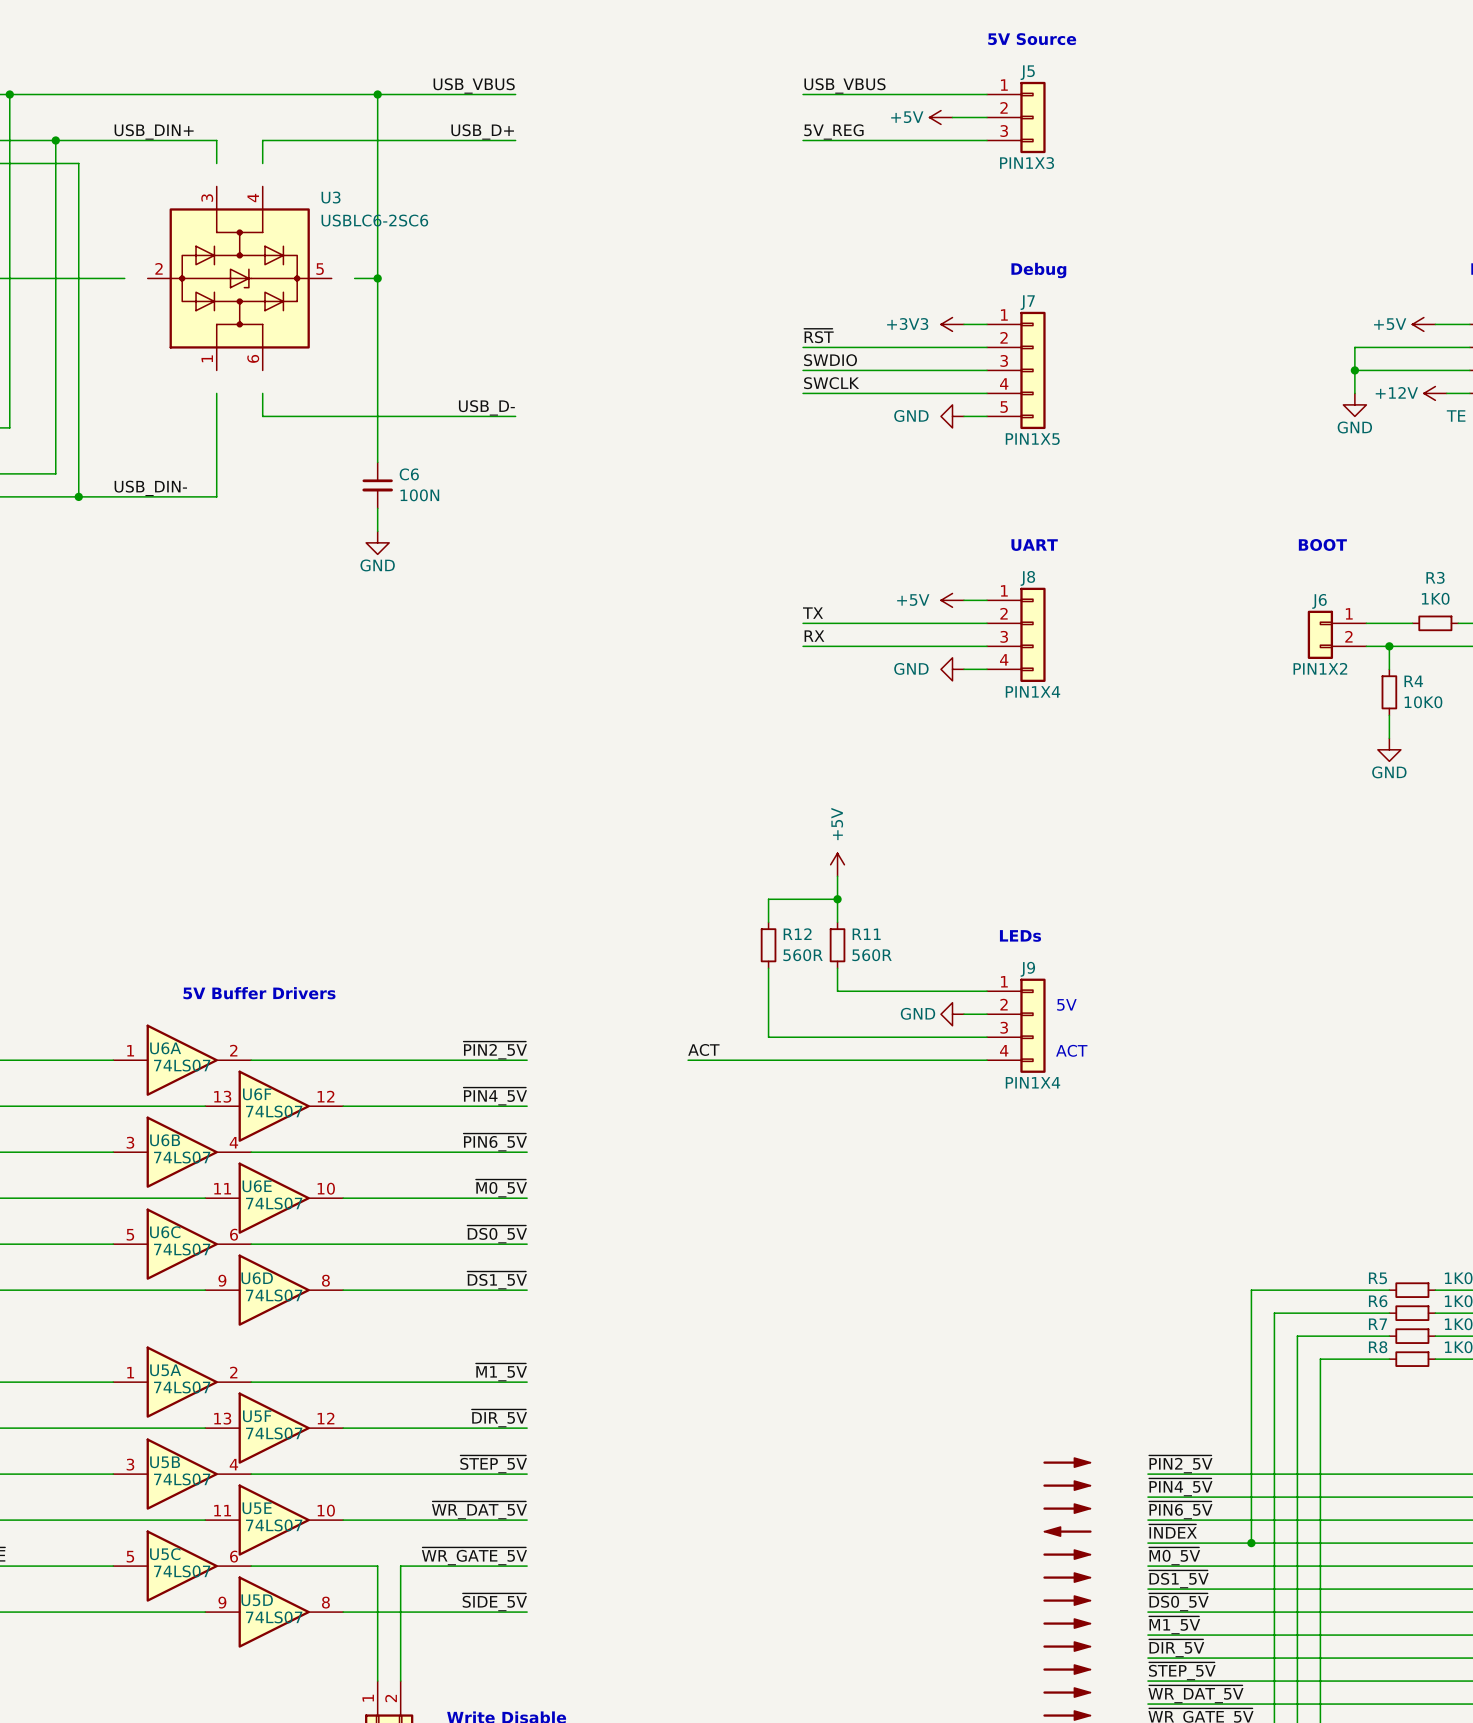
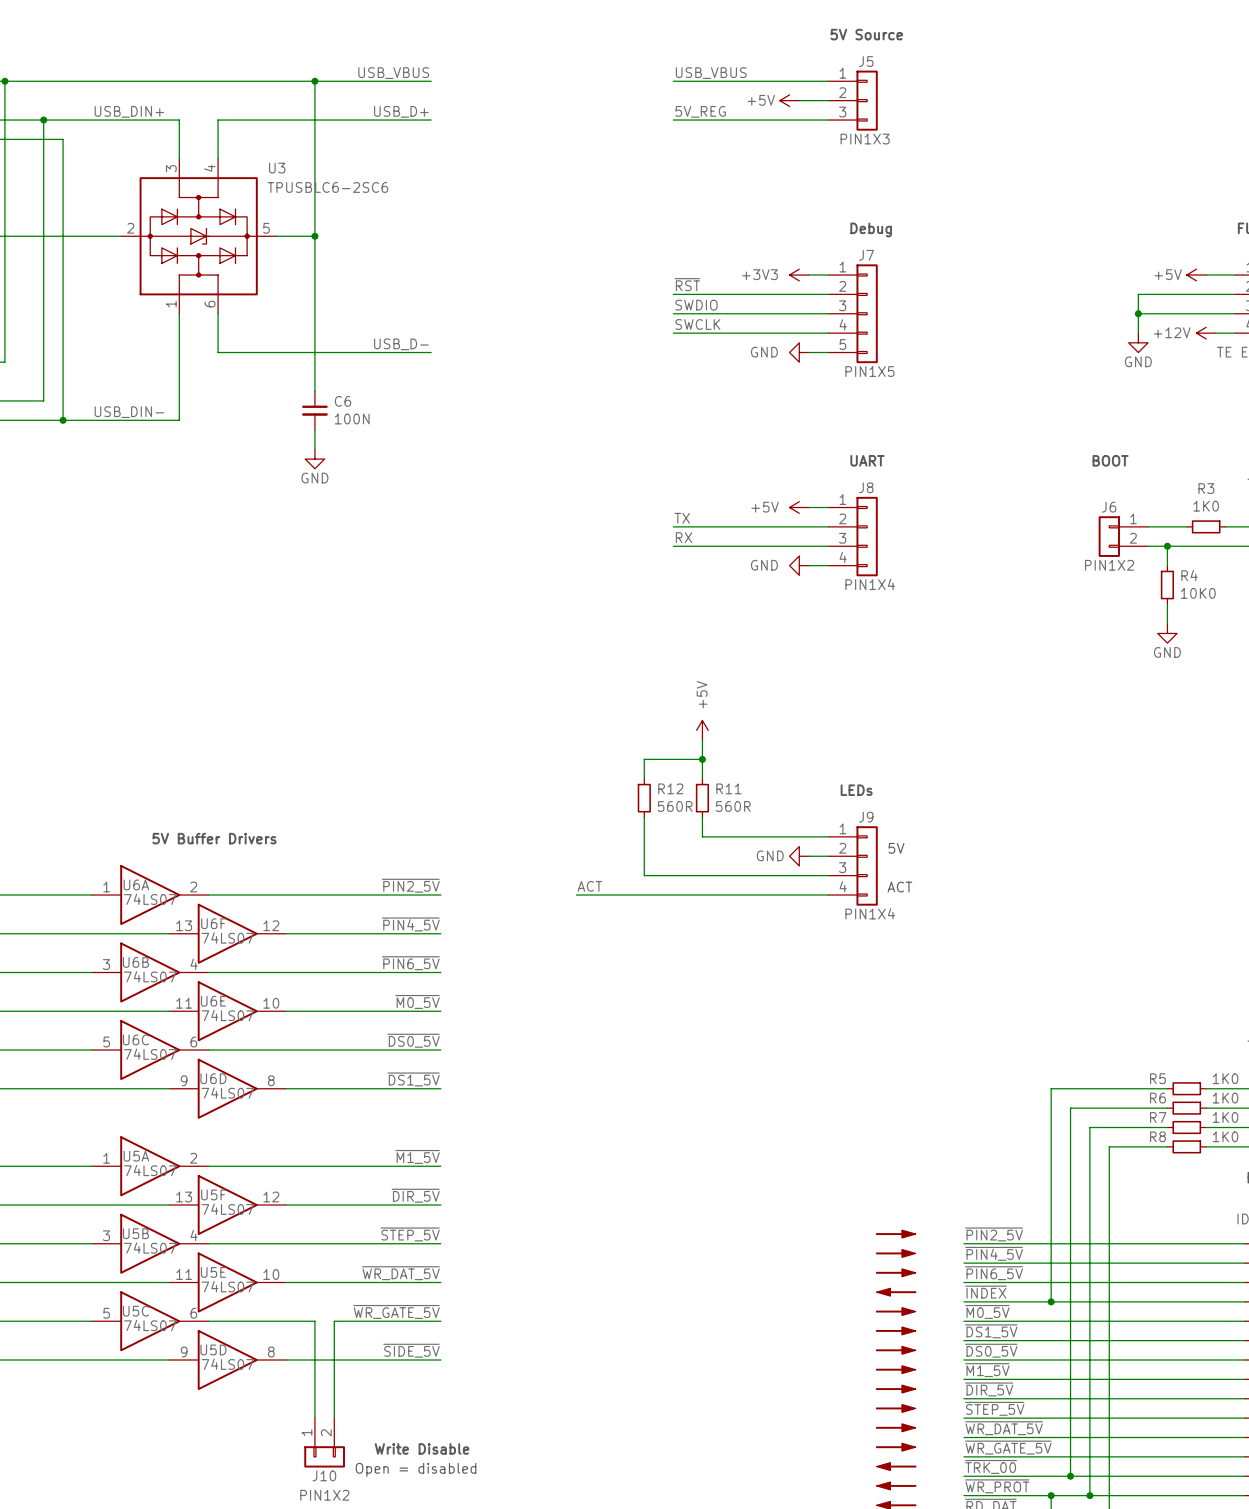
wire: none -> (179, 139) (179, 158)
wire: none -> (218, 139) (218, 158)
U3 value: USBLC6-2SC6 (374, 220) -> TPUSBLC6-2SC6 (327, 187)
wire: none -> (101, 236) (121, 236)
wire: none -> (276, 236) (295, 236)
wire: none -> (179, 313) (179, 333)
wire: none -> (218, 313) (218, 333)

